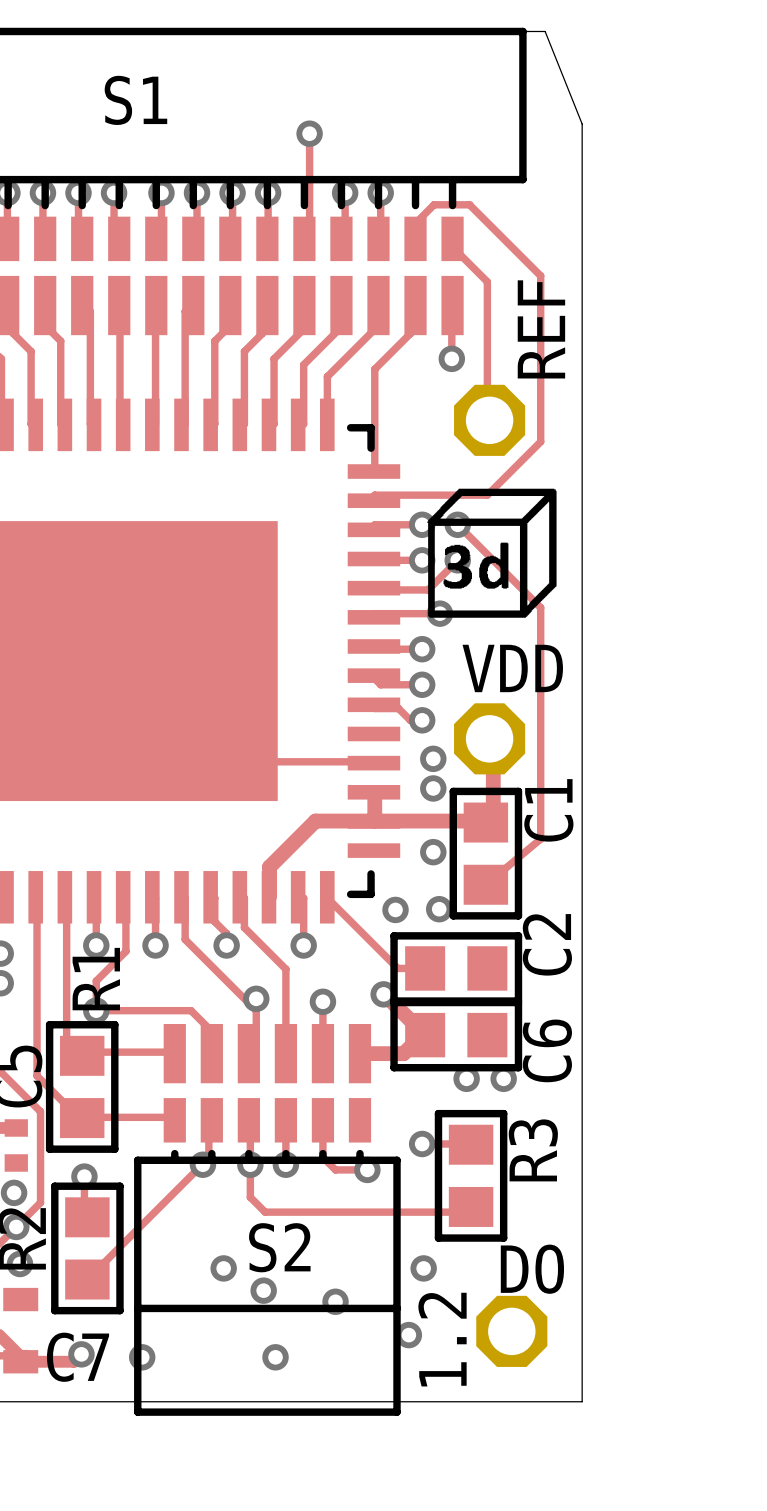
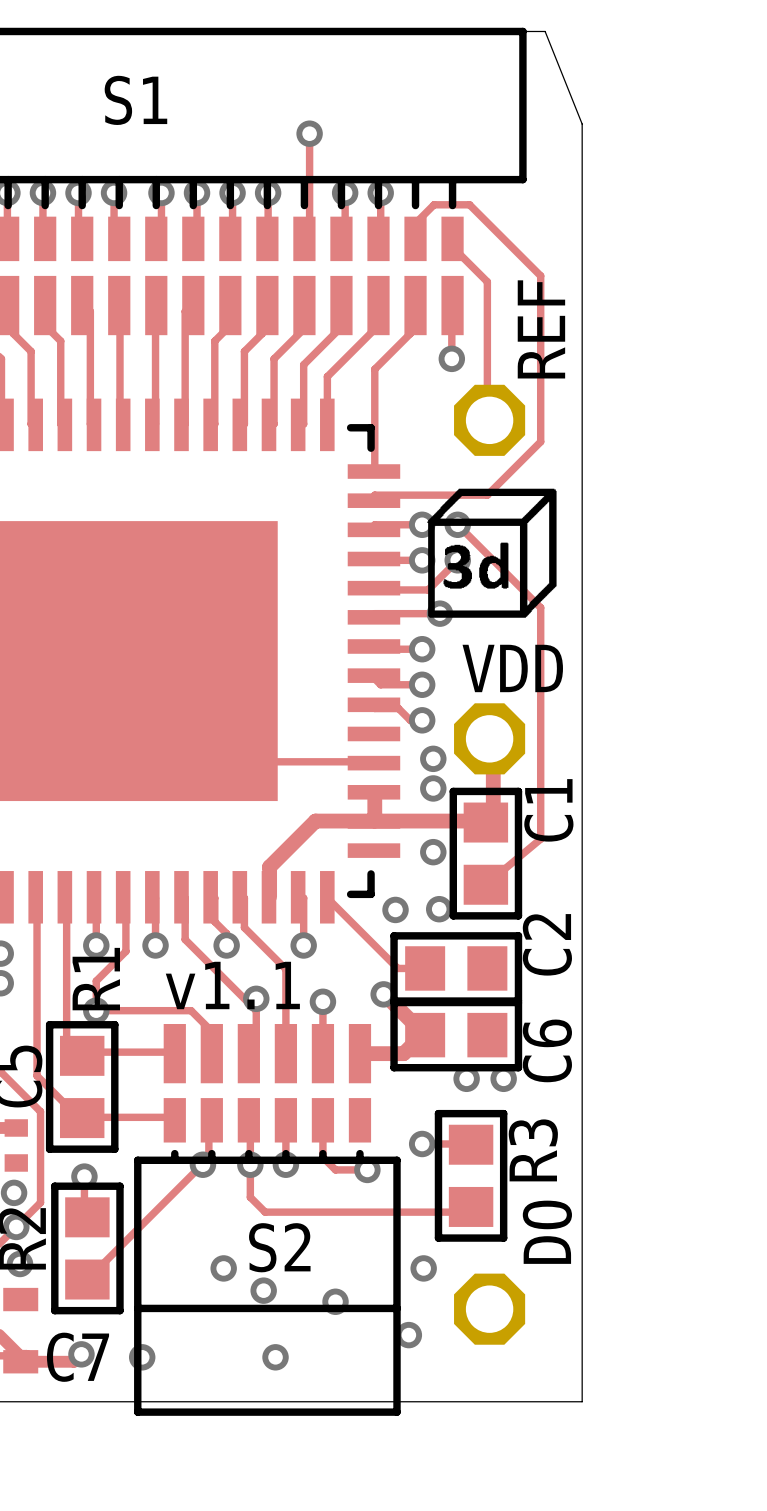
text: none -> v1.1 (232, 985)
DO name rotation: 0° (532, 1269) -> 90° counterclockwise (547, 1232)
DO position: (511, 1331) -> (489, 1309)
text: 1.2 (442, 1339) -> none

